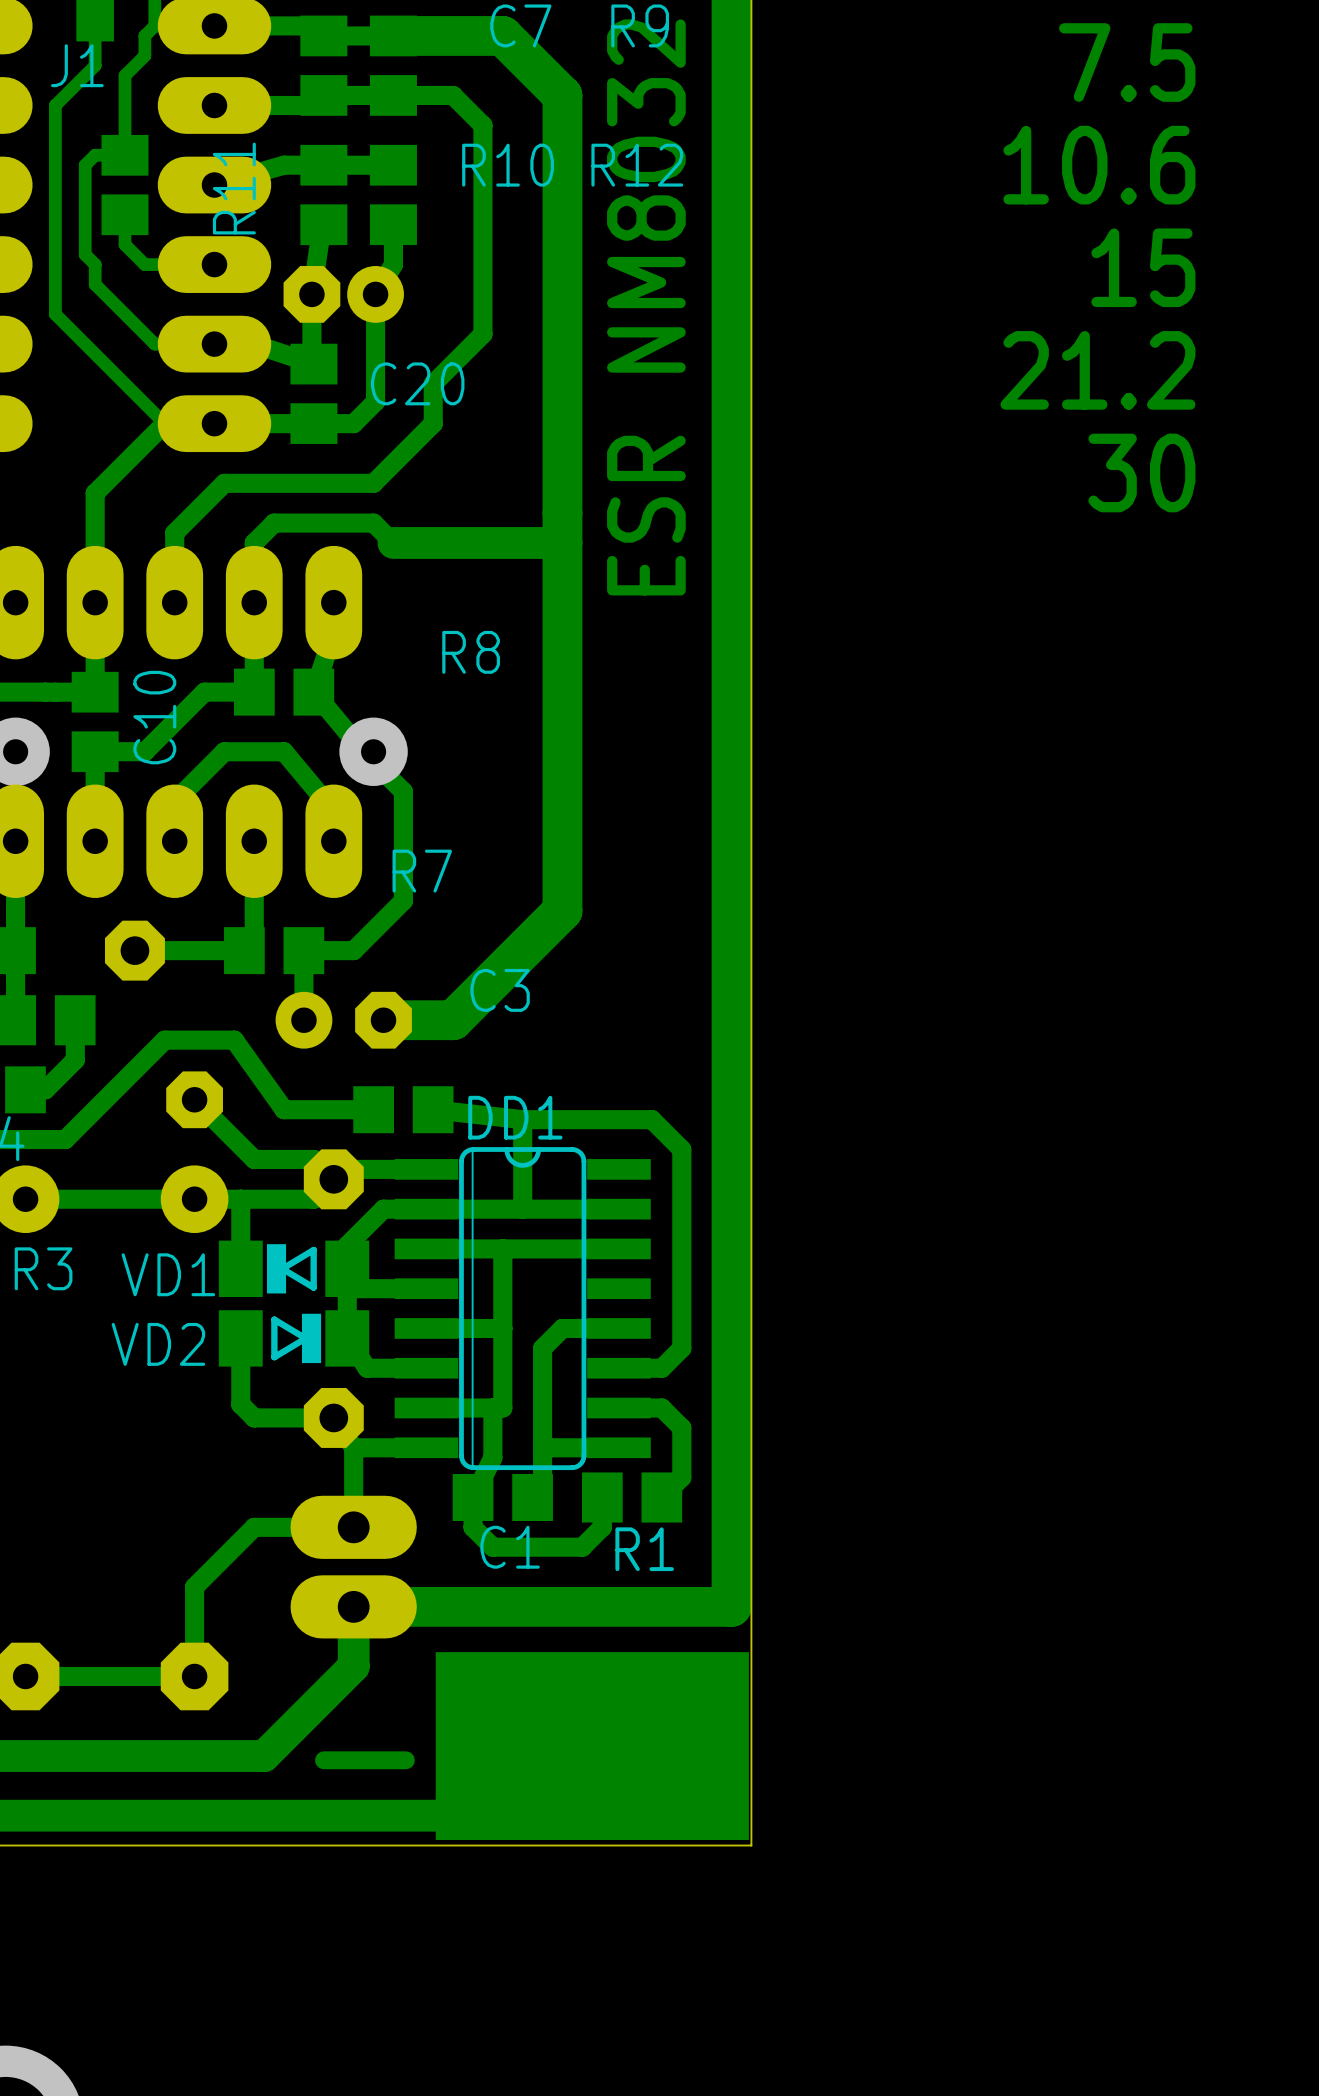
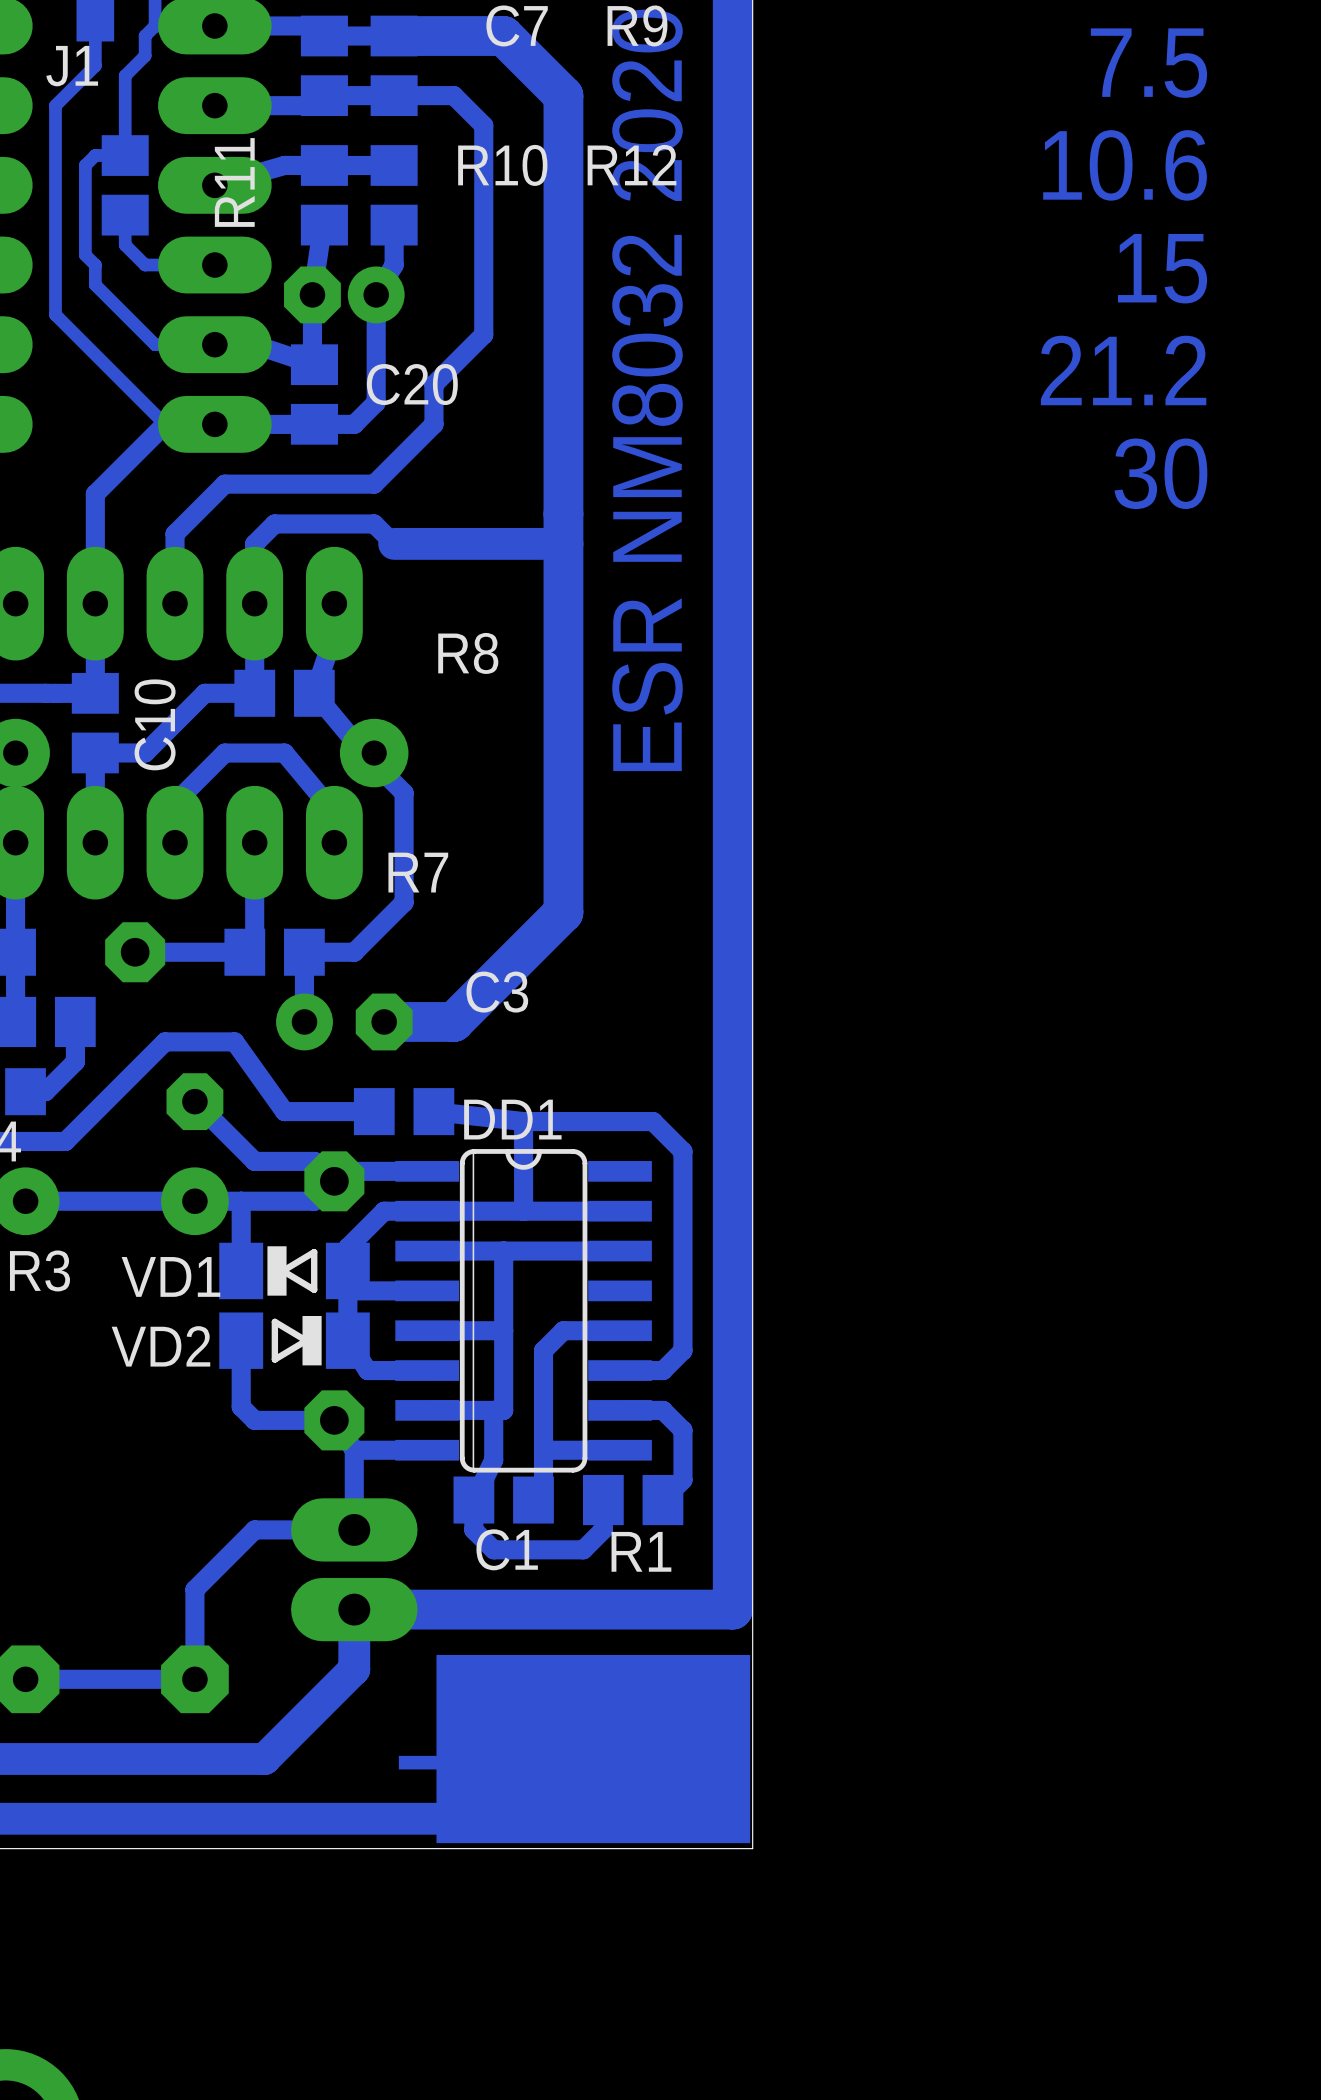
text: ESR NM8032 (646, 307) -> ESR NM8032 2020 (647, 390)

